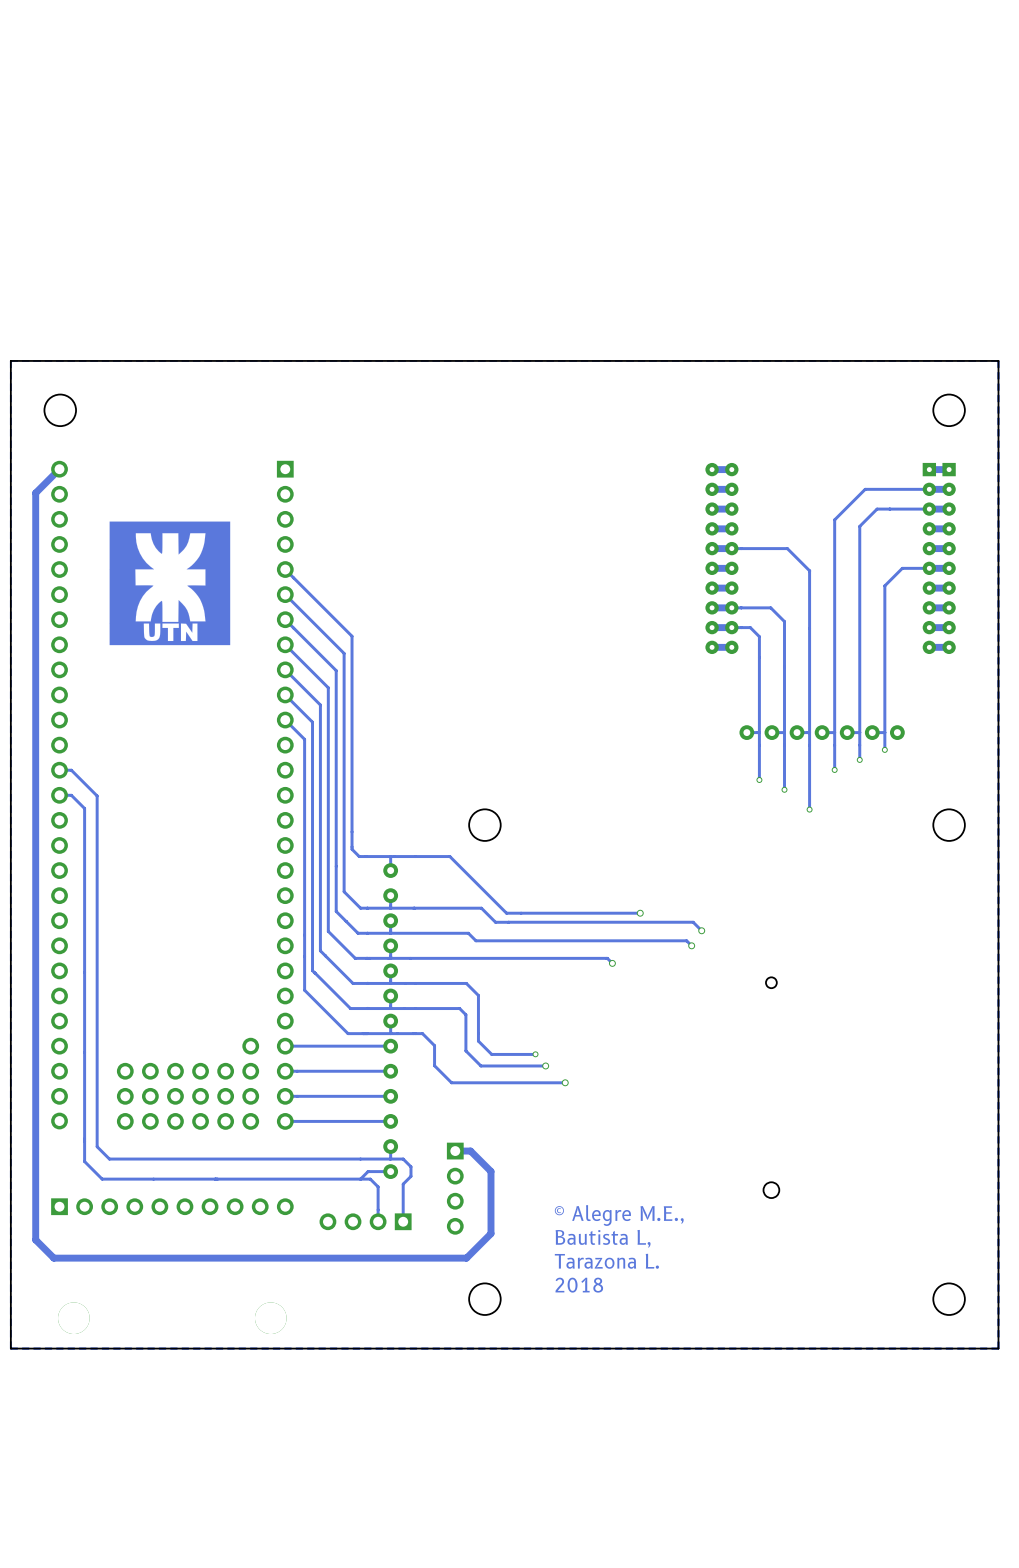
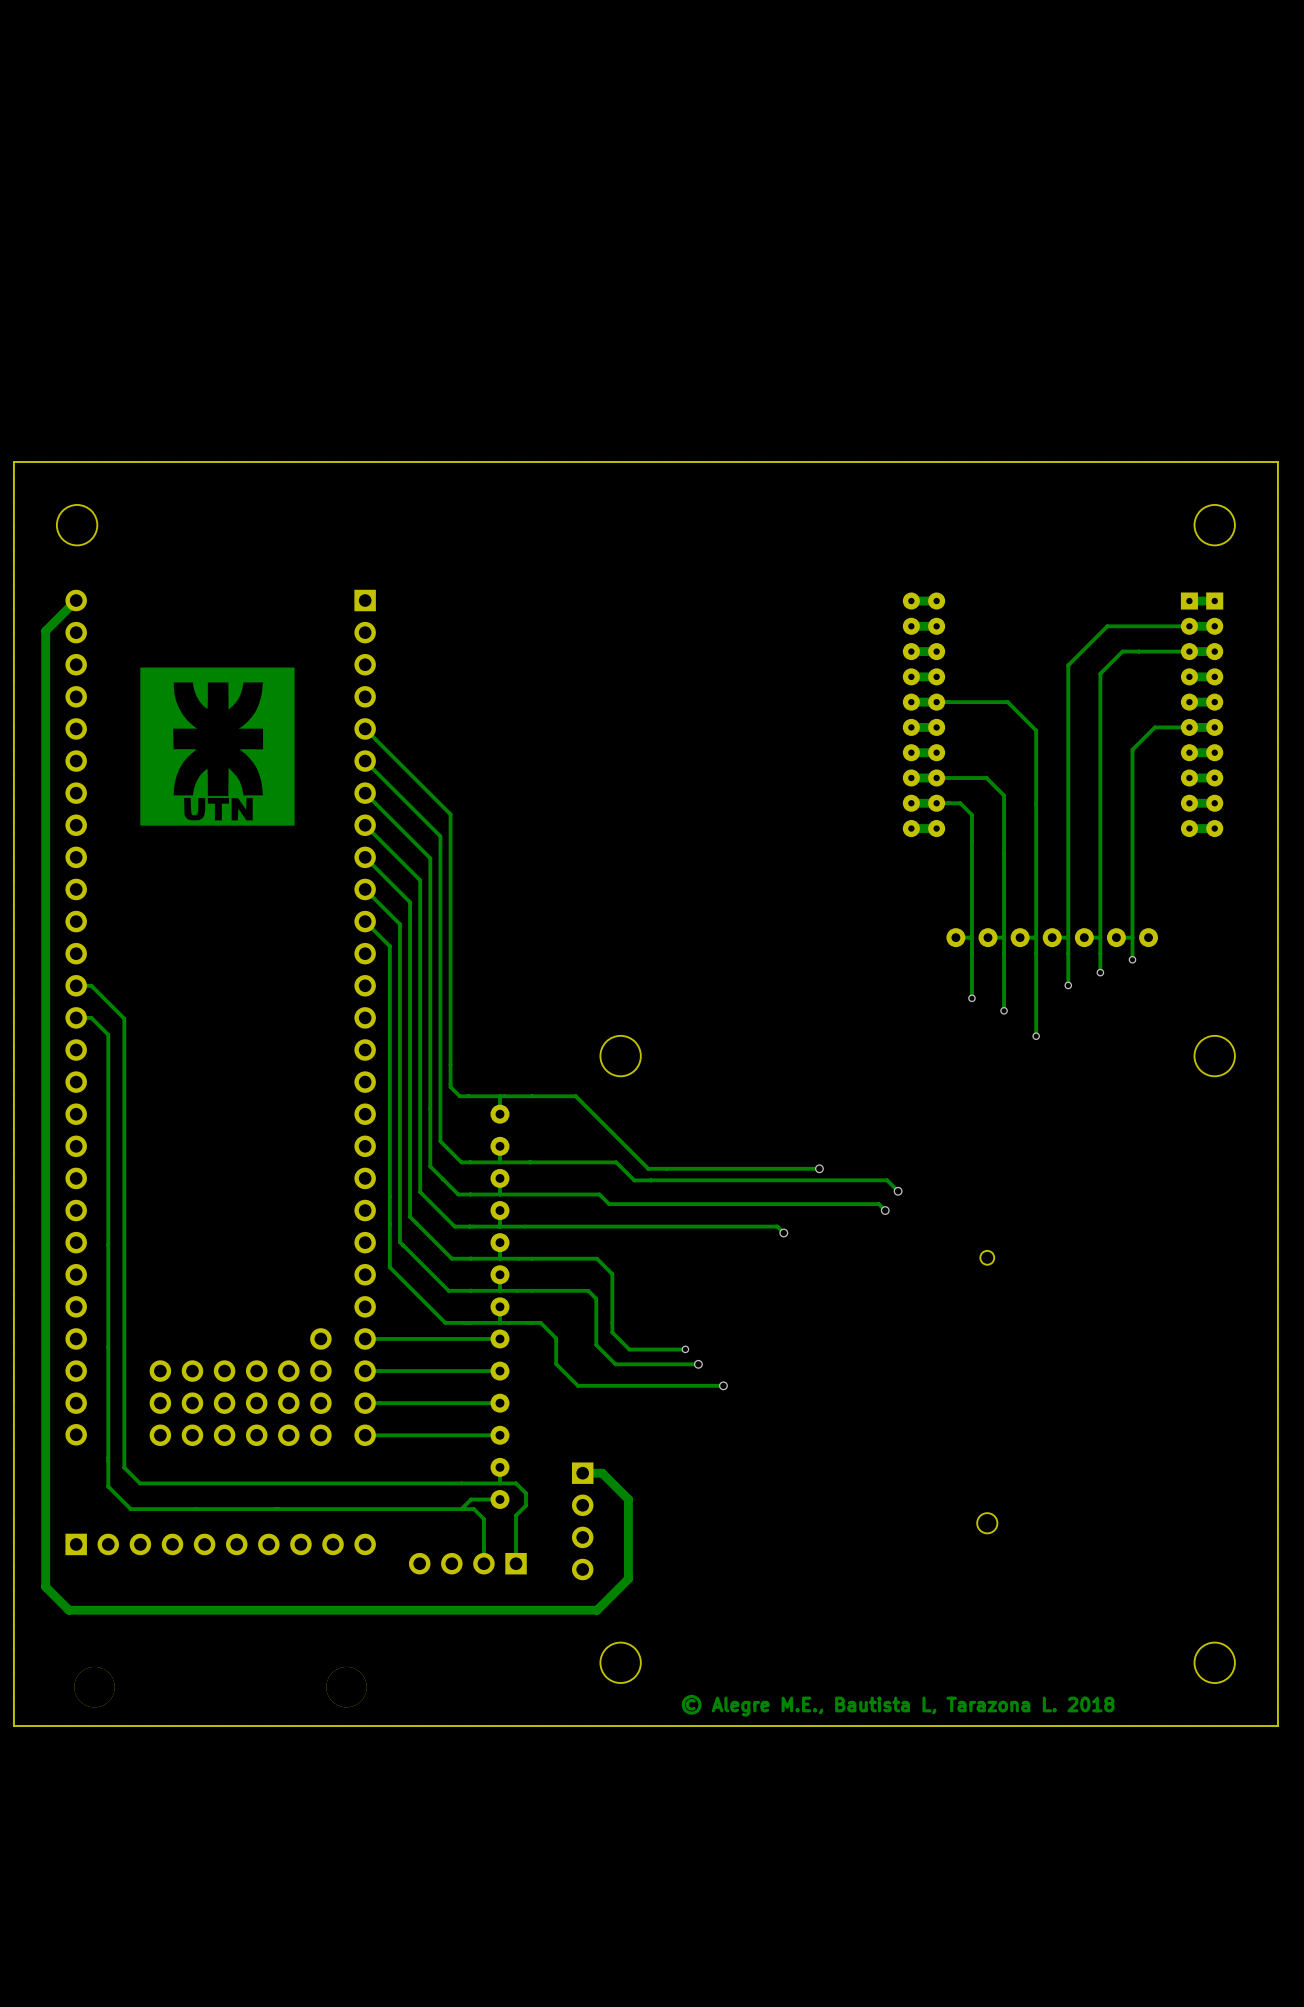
text: © Alegre M.E., (619, 1215) -> none
text: Bautista L, (603, 1238) -> none
text: Tarazona L. (606, 1261) -> none
text: 2018 (579, 1285) -> none
text: none -> © Alegre M.E., Bautista L, Tarazona L. 2018 (898, 1705)

